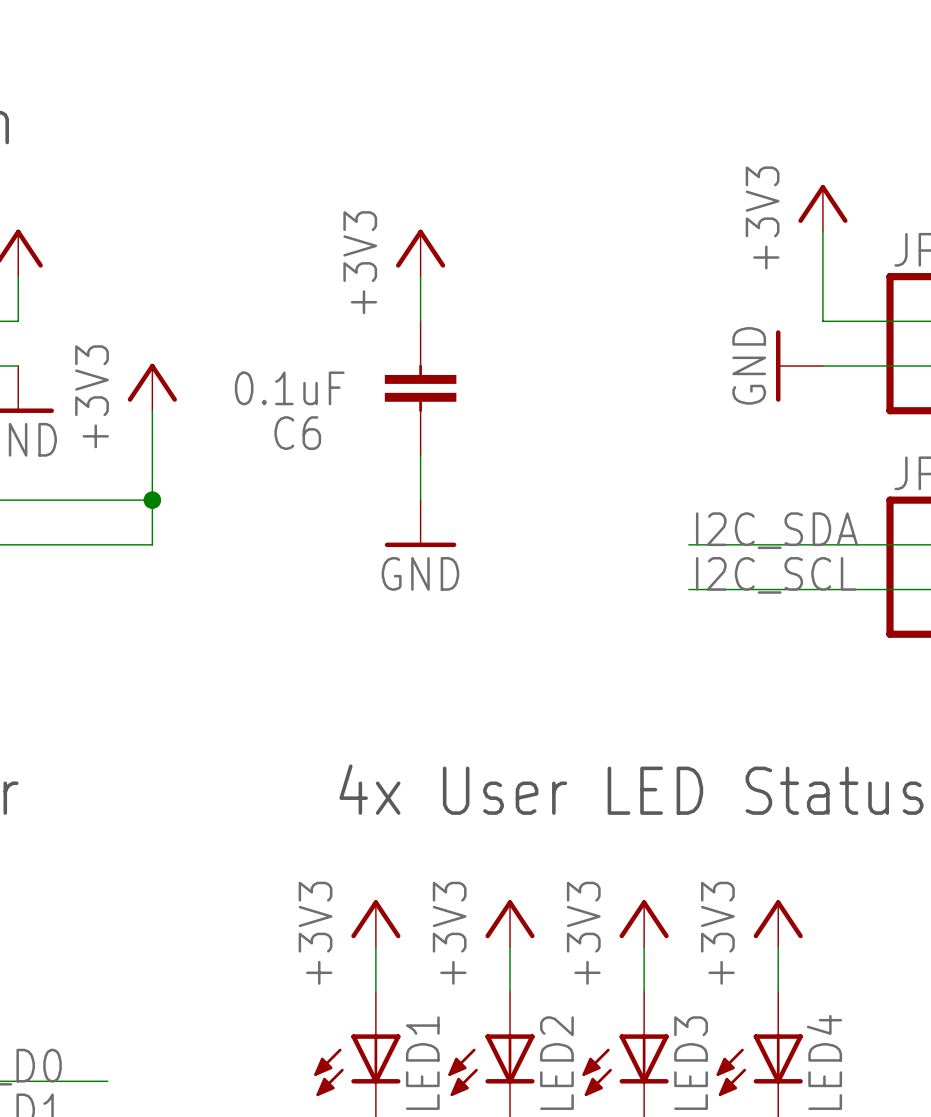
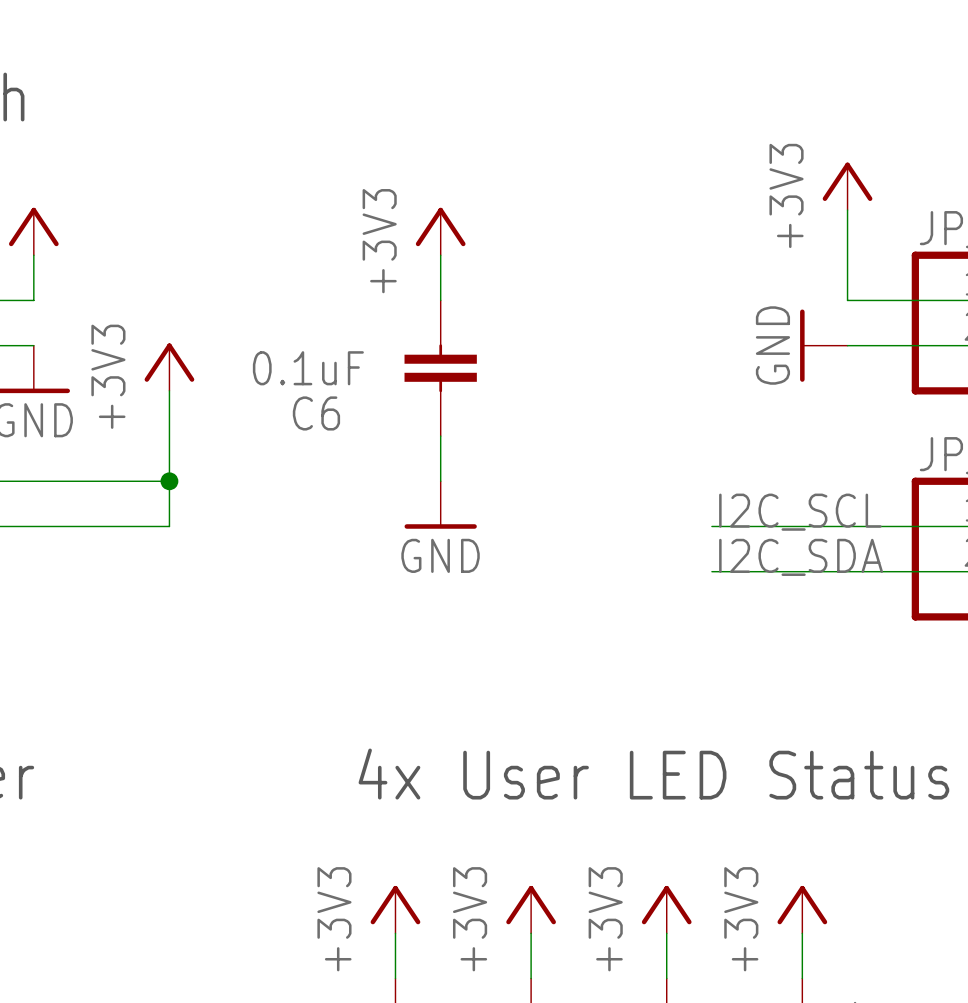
label: I2C_SDA (776, 530) -> I2C_SCL (800, 512)
label: I2C_SCL (776, 575) -> I2C_SDA (801, 557)

